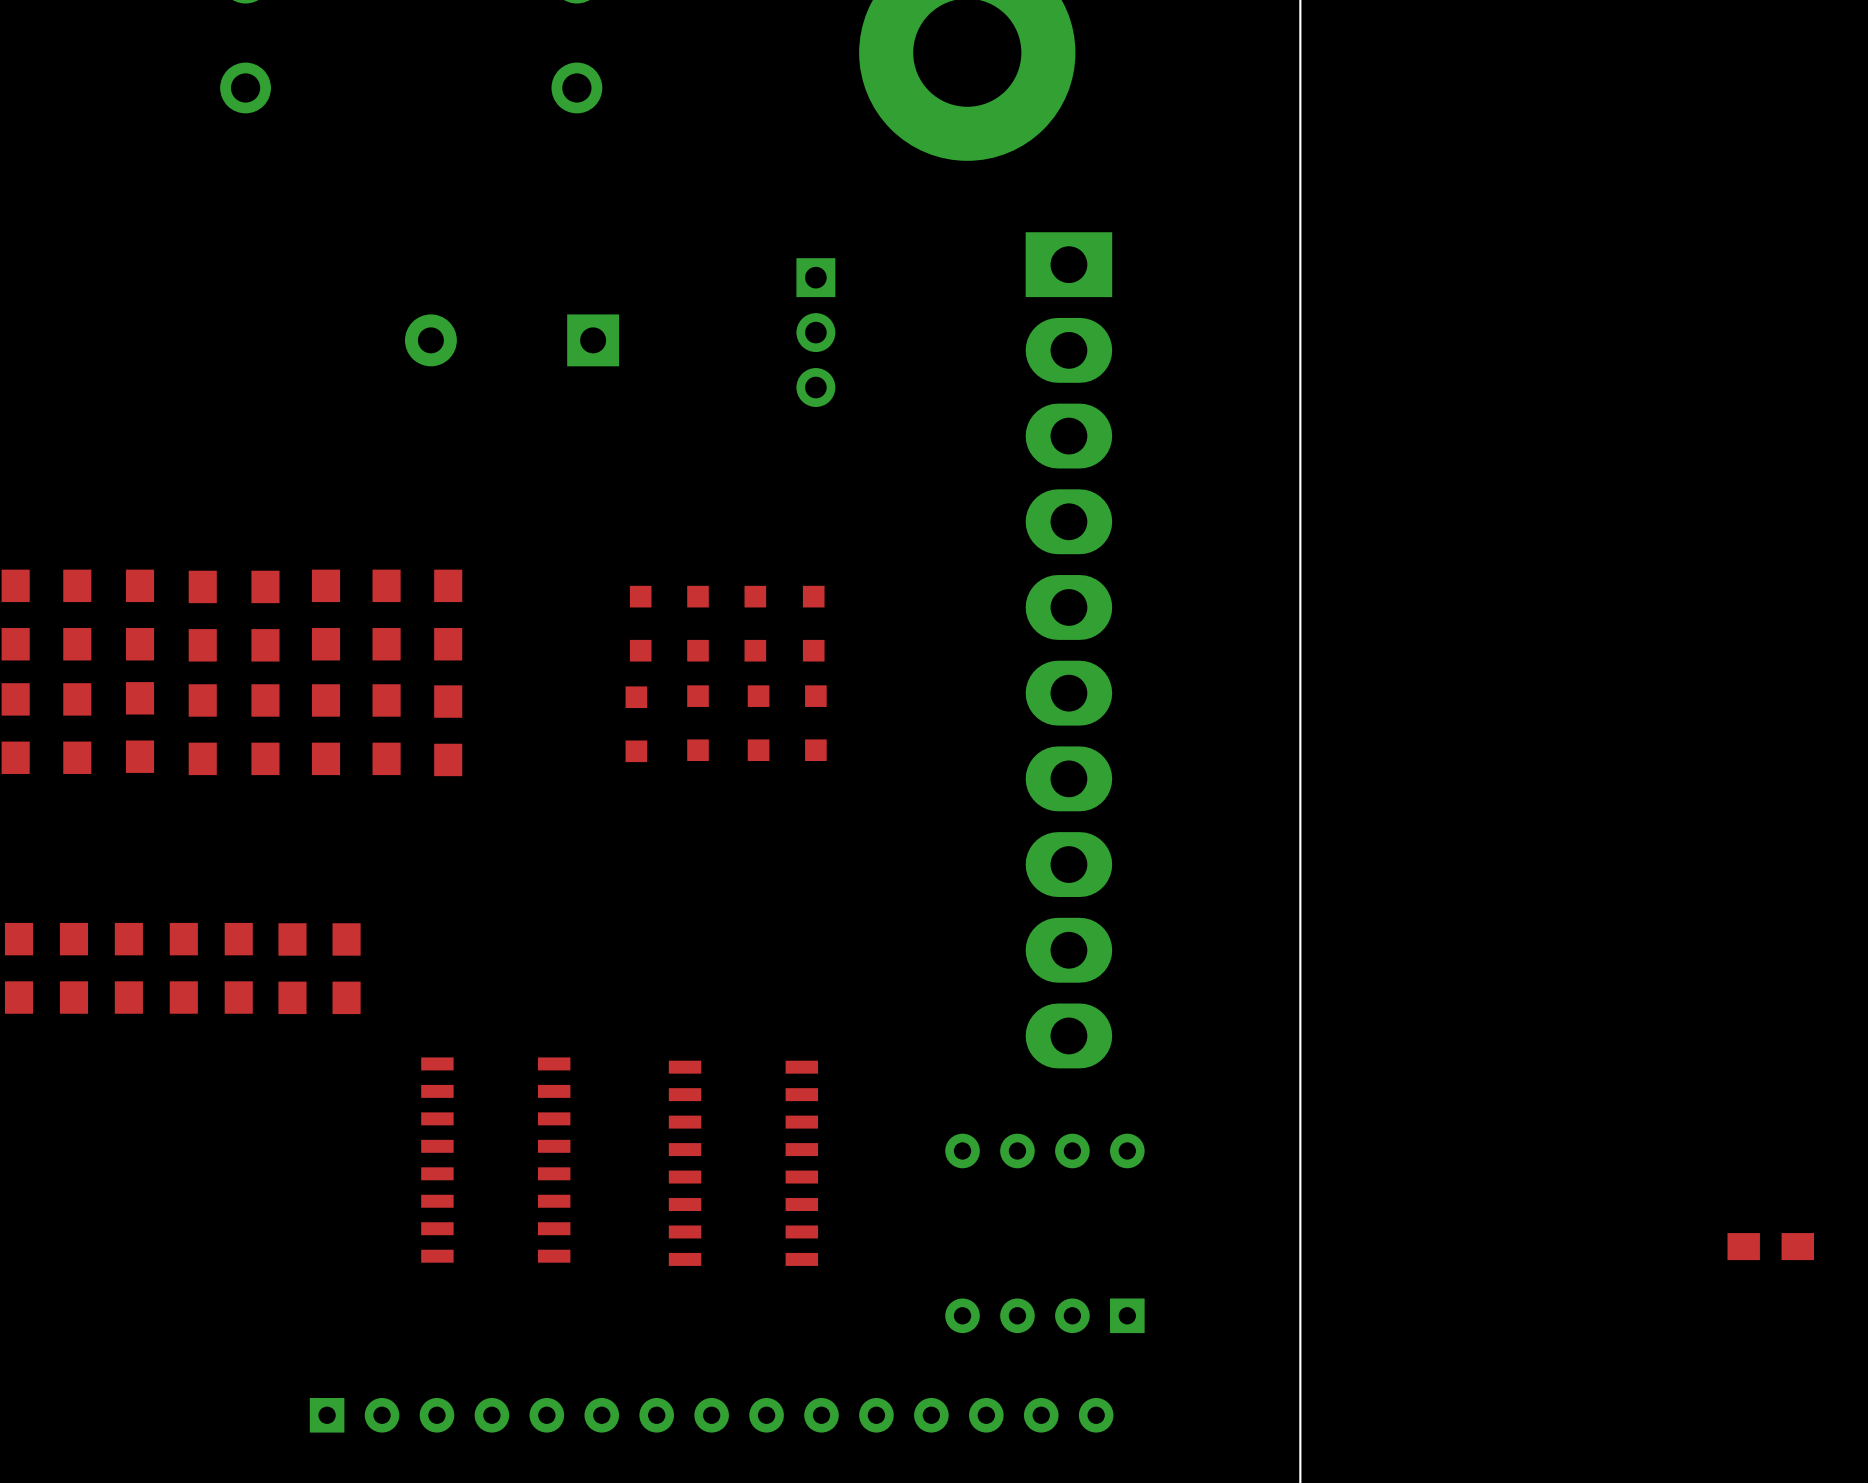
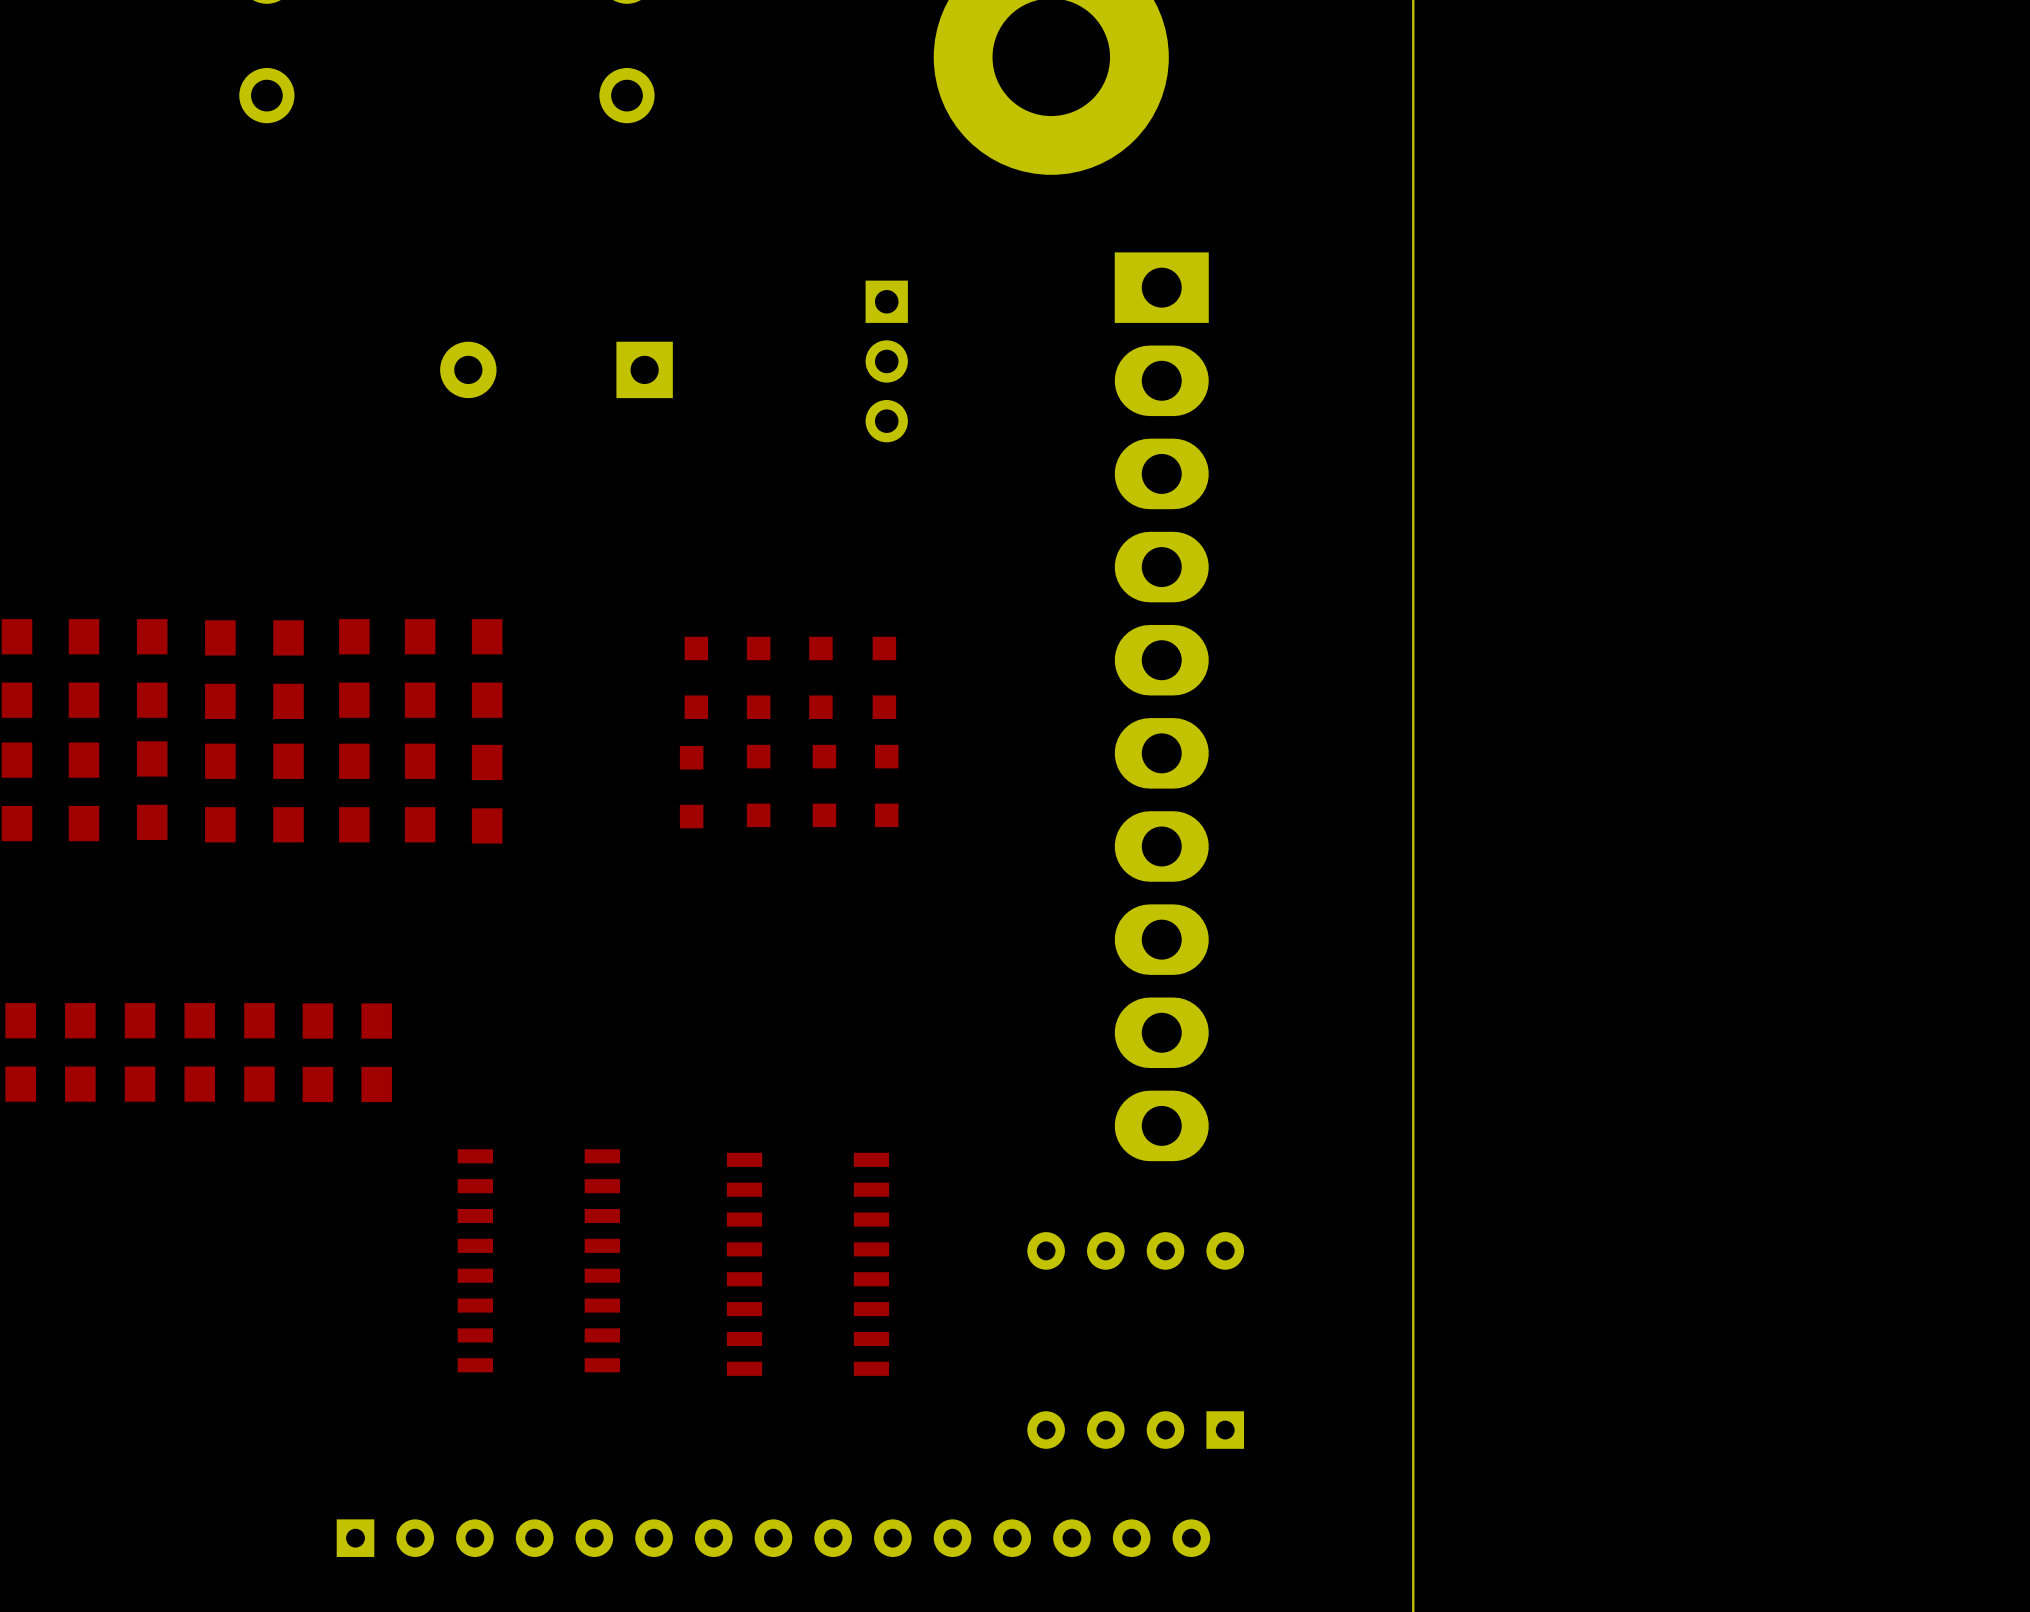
part: (1770, 1246) -> none

